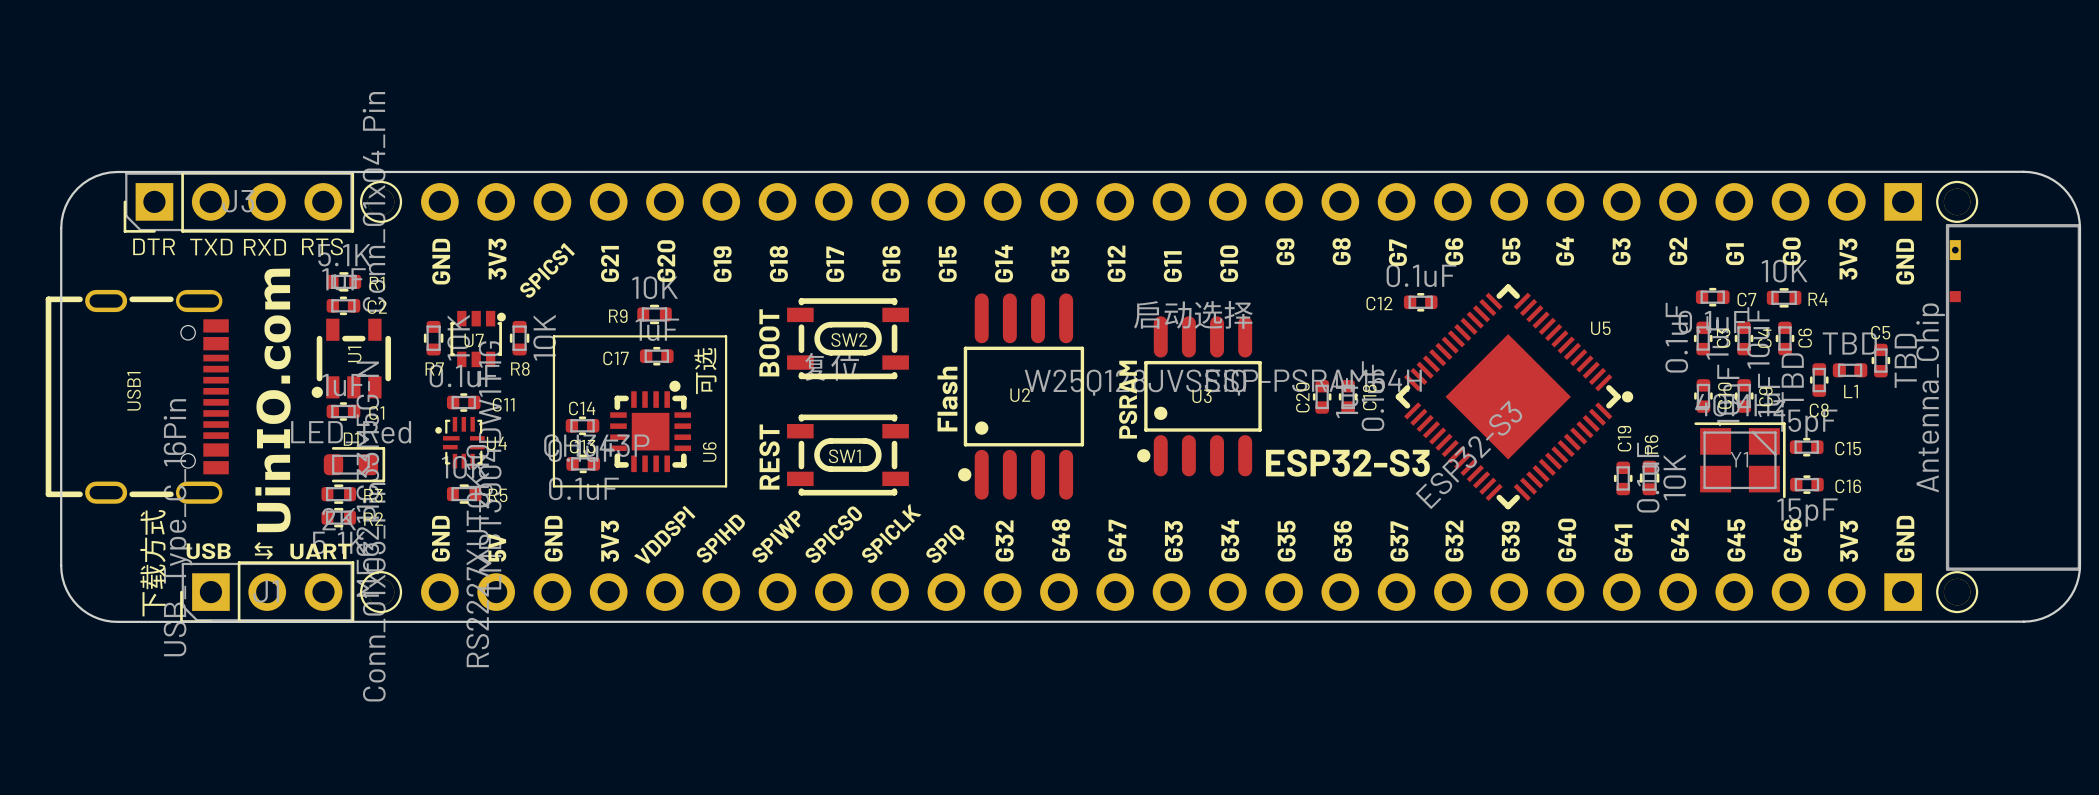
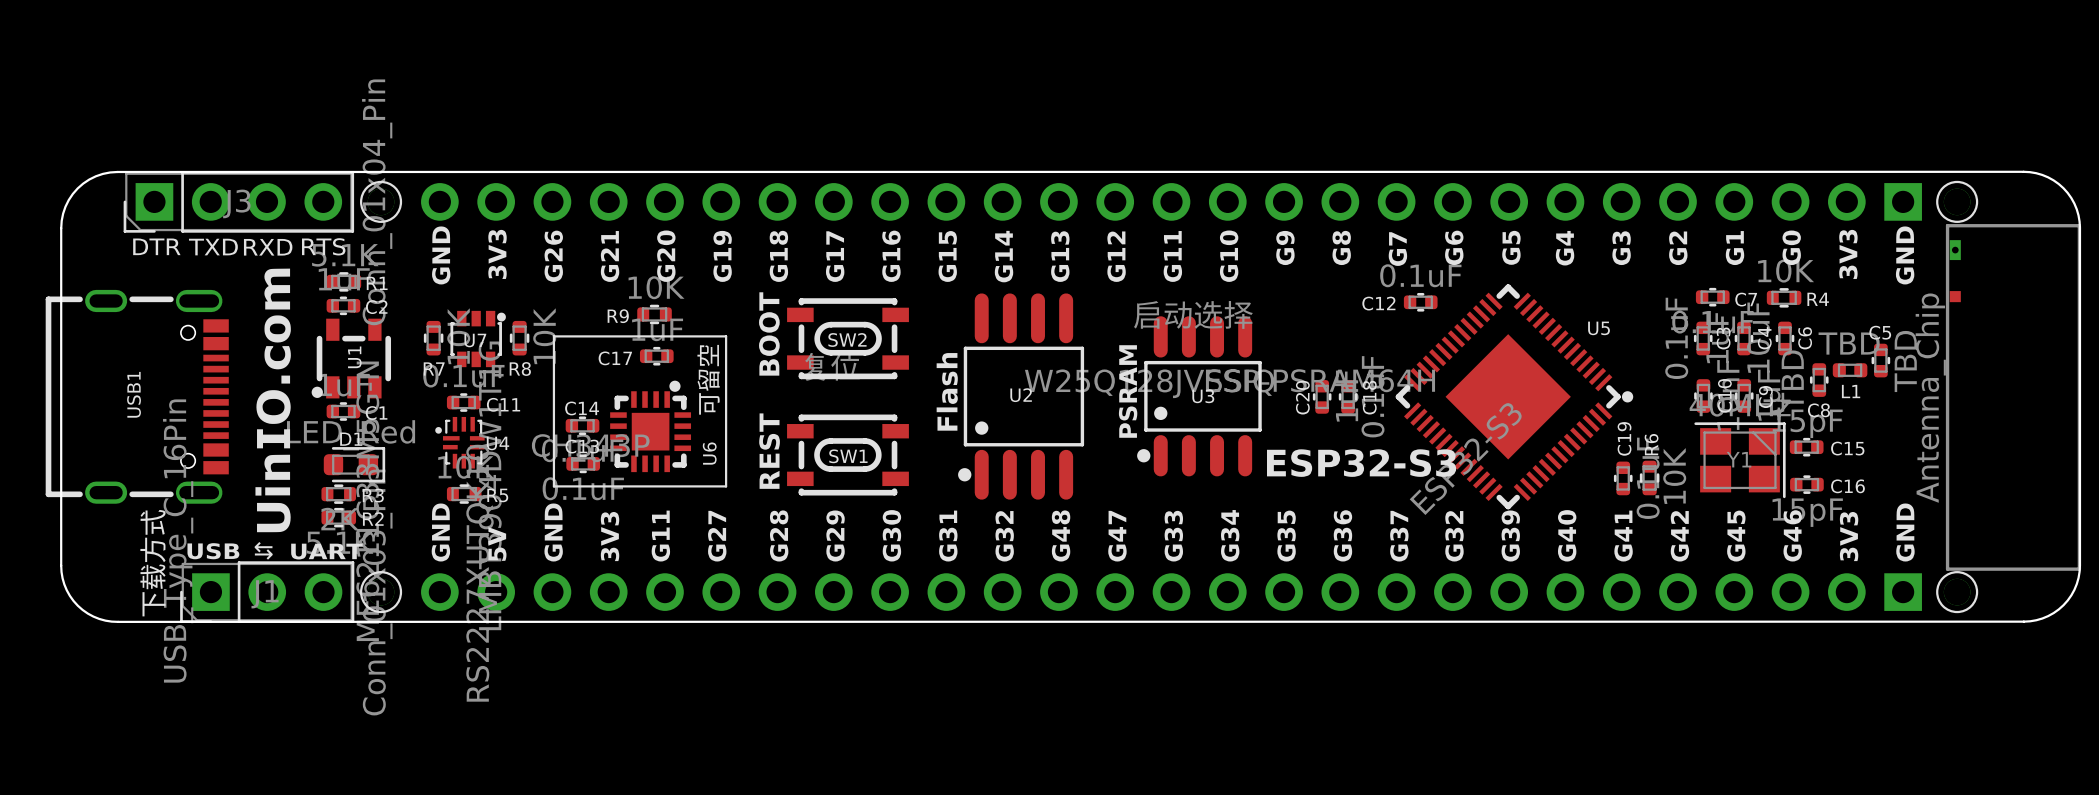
text: none -> G26 (553, 256)
text: SPICS1 (547, 270) -> none
text: 可选 (705, 370) -> 可留空 (708, 379)
text: SPICLK (891, 533) -> none
text: VDDSPI (664, 534) -> none
text: SPICS0 (833, 534) -> none
text: SPIWP (776, 536) -> none
text: SPIHD (720, 538) -> none
text: none -> G28 (779, 535)
text: none -> G30 (891, 535)
text: none -> G27 (717, 536)
text: none -> G29 (835, 535)
text: SPIQ (945, 543) -> none
text: none -> G31 (948, 536)
text: none -> G11 (660, 536)

